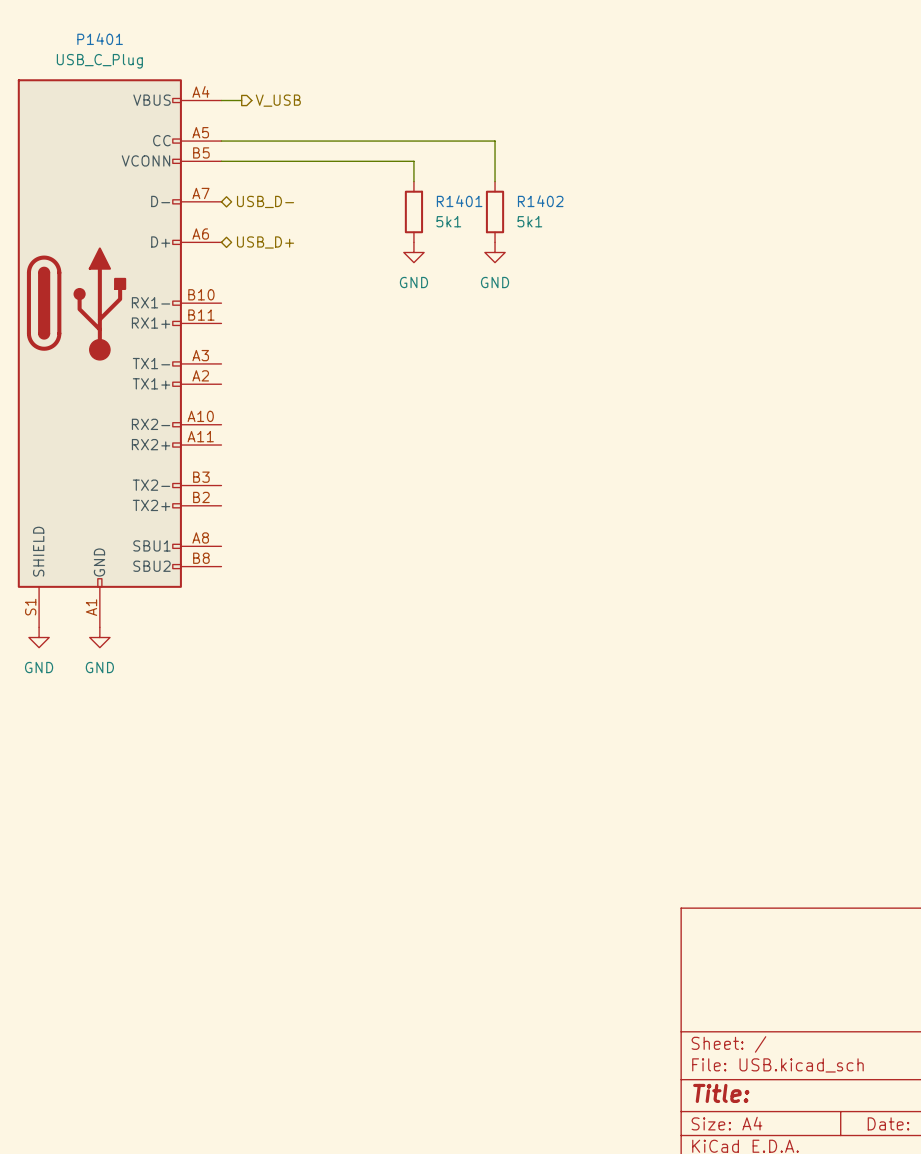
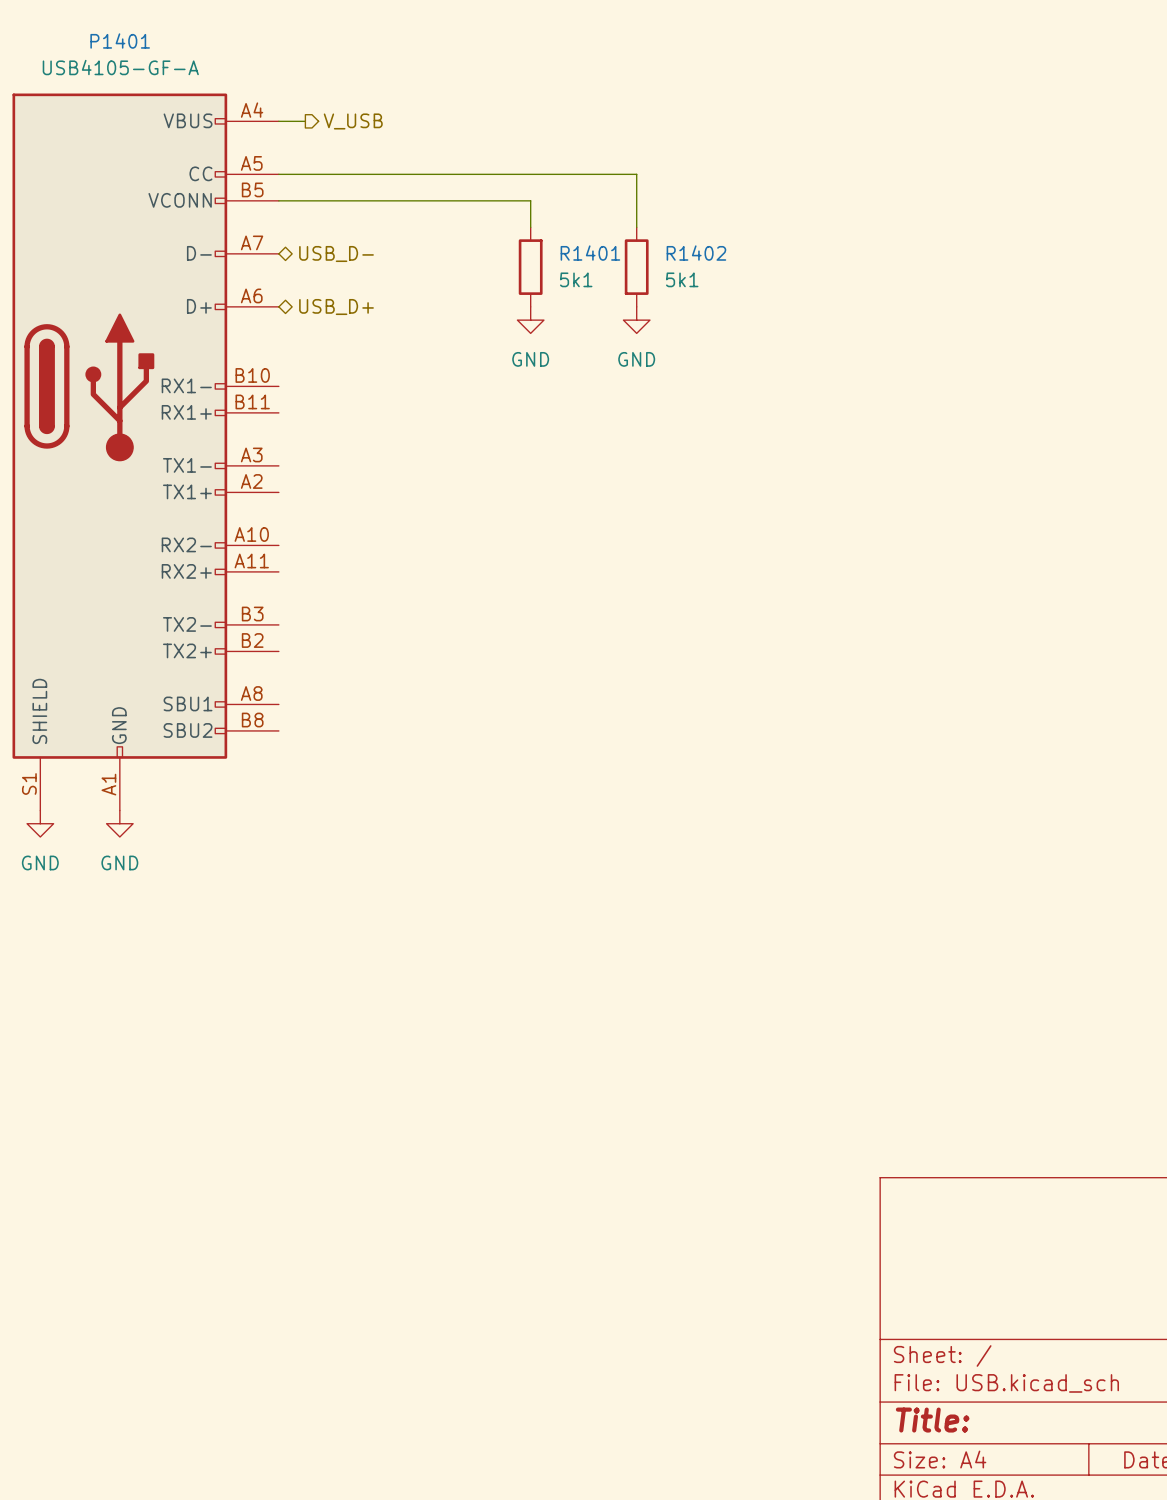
P1401 value: USB_C_Plug (99, 61) -> USB4105-GF-A (120, 67)

